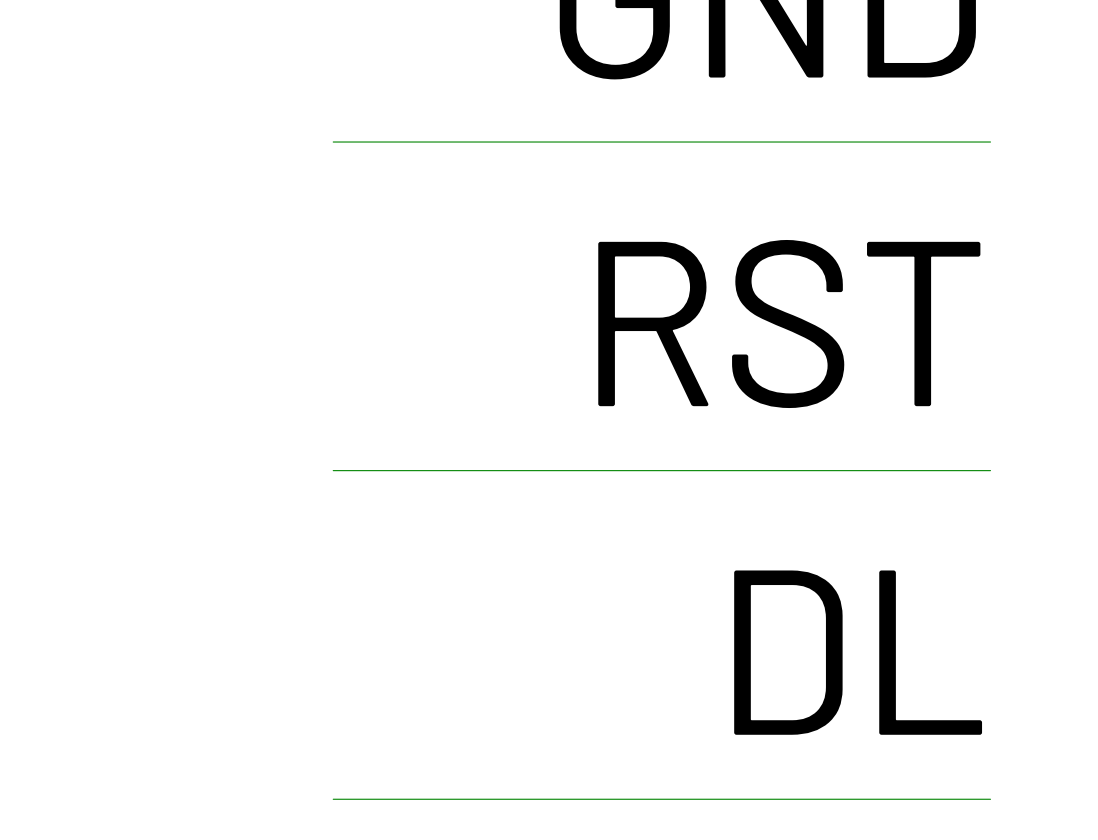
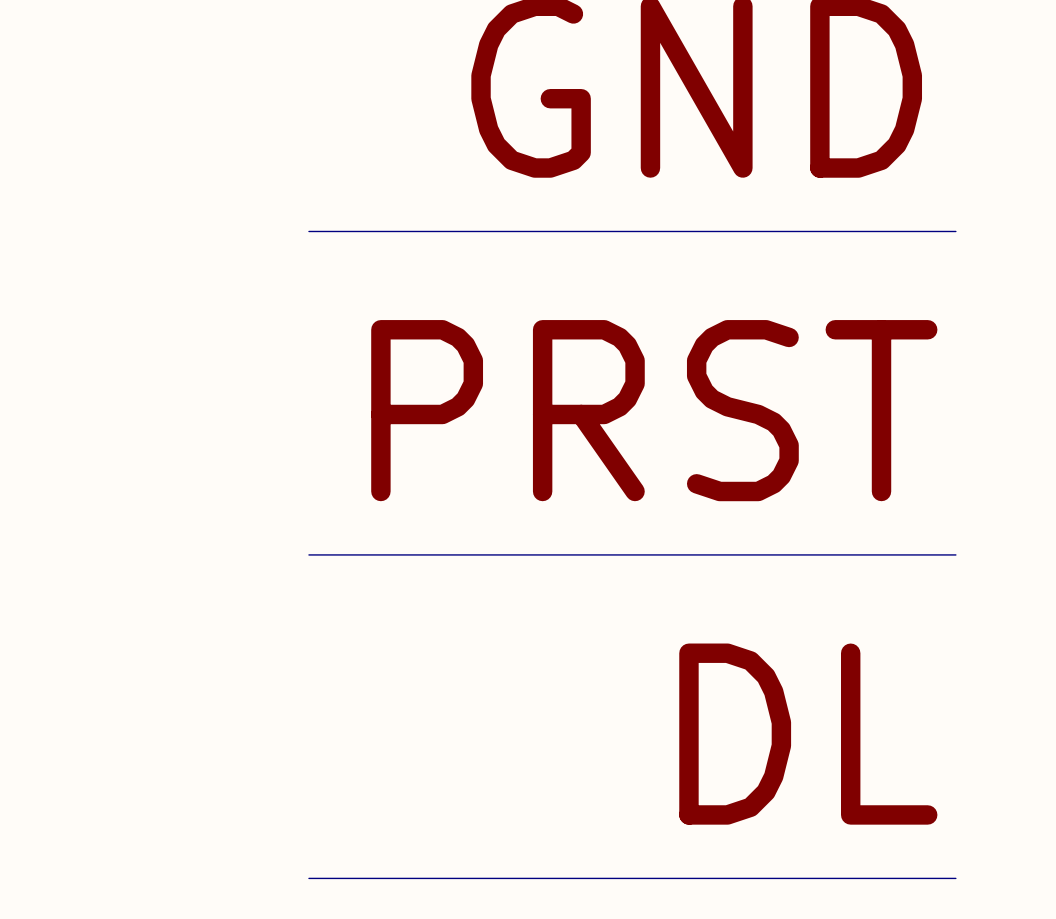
label: RST (789, 324) -> PRST (654, 410)

